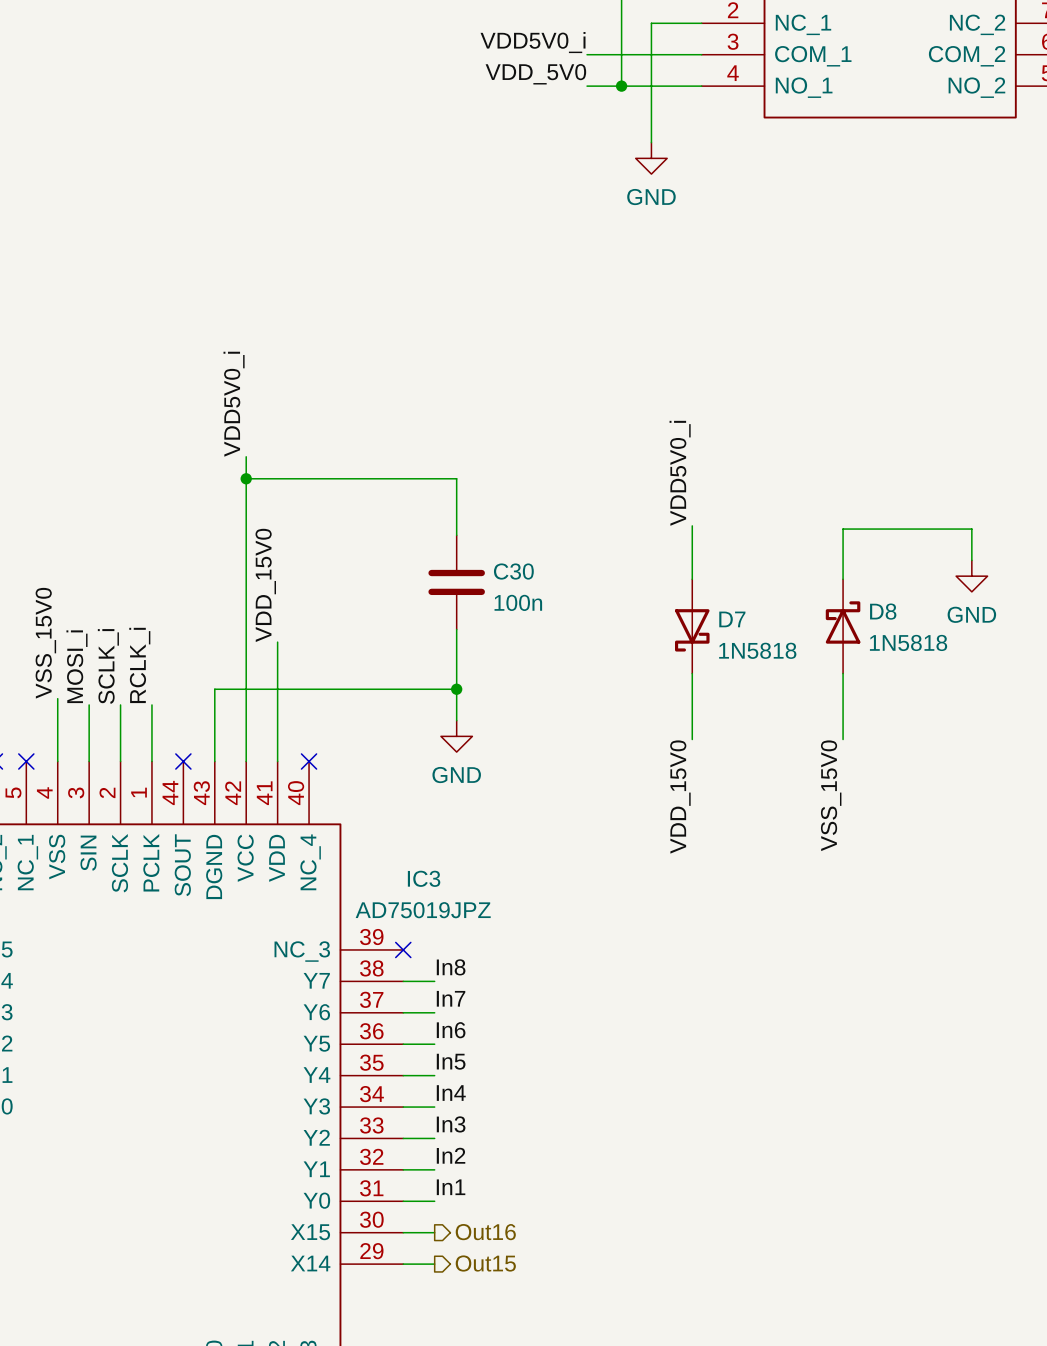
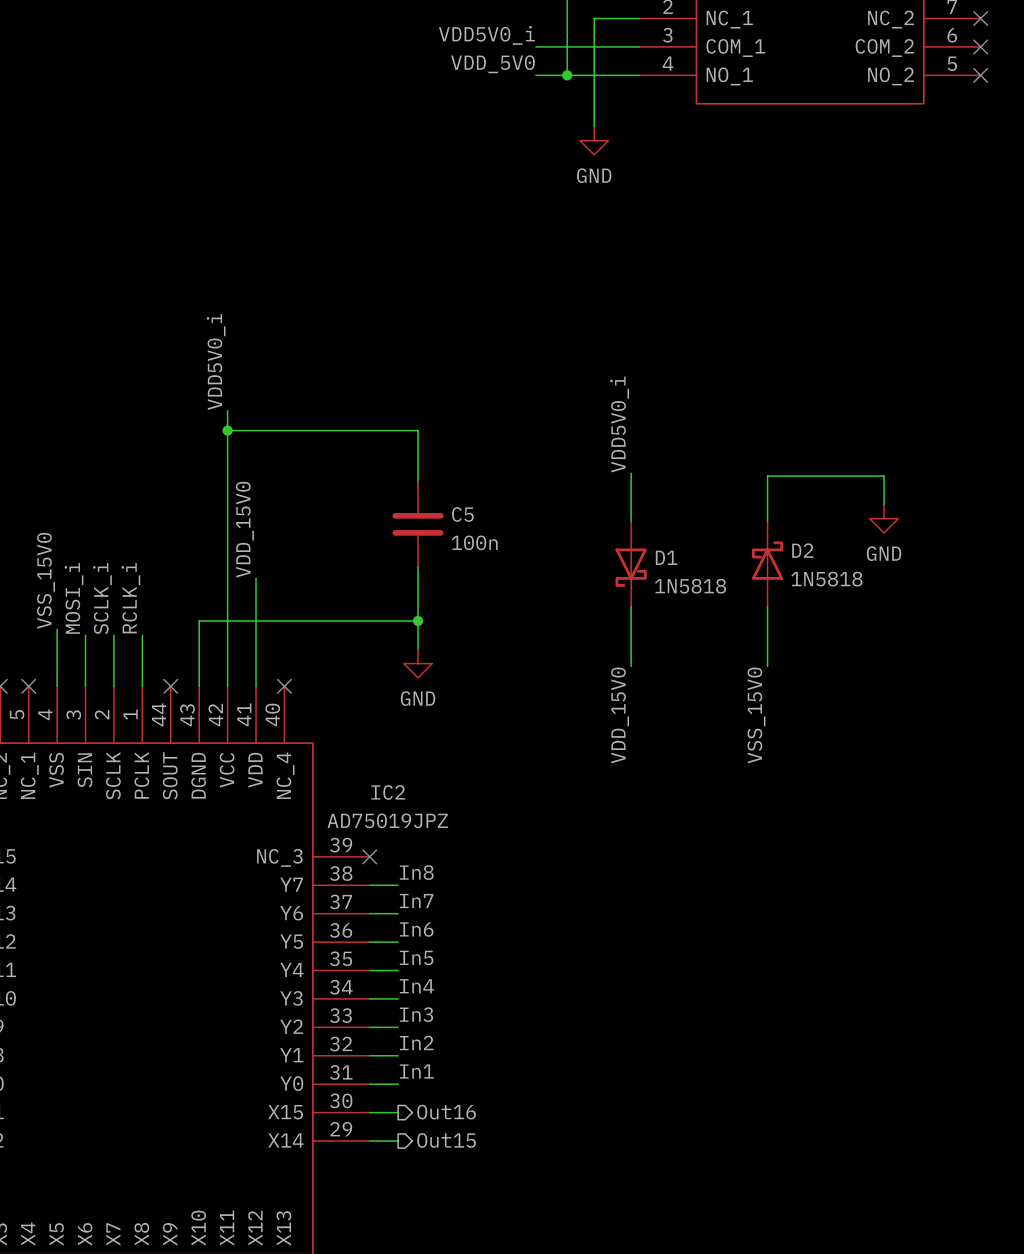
C30 name: C30 (513, 571) -> C5 (462, 514)
D8 name: D8 (883, 611) -> D2 (802, 550)
D7 name: D7 (732, 619) -> D1 (666, 557)
IC3 name: IC3 (424, 878) -> IC2 (388, 792)

